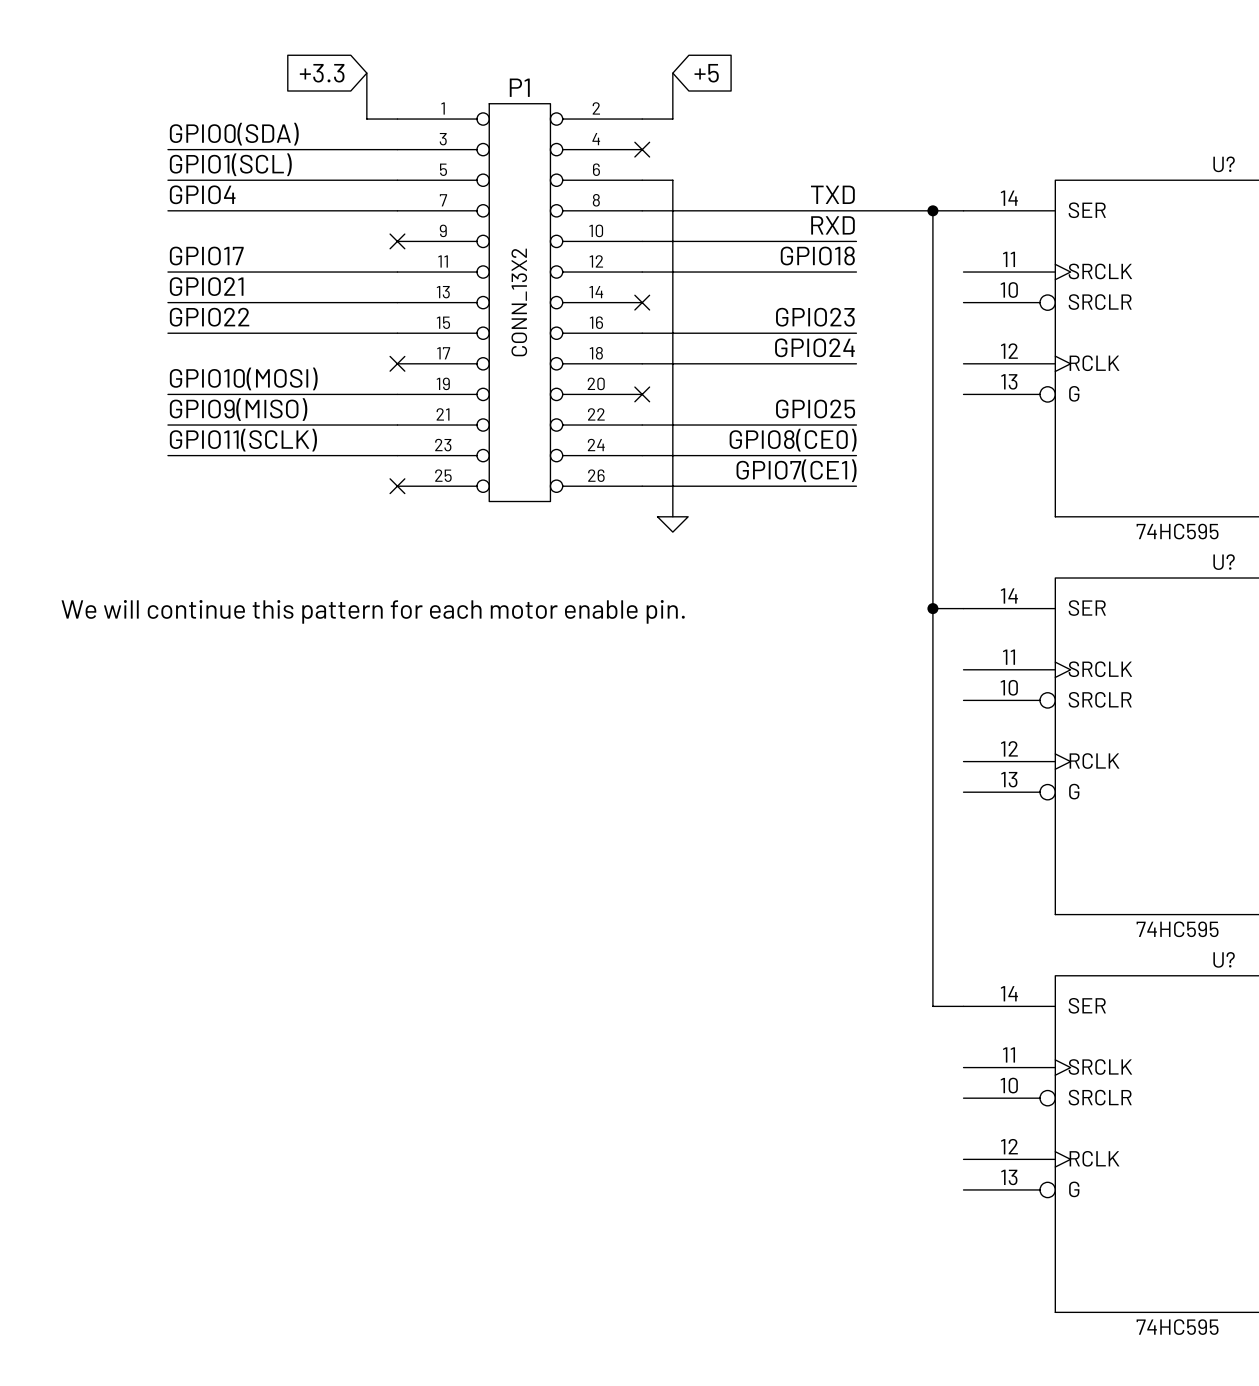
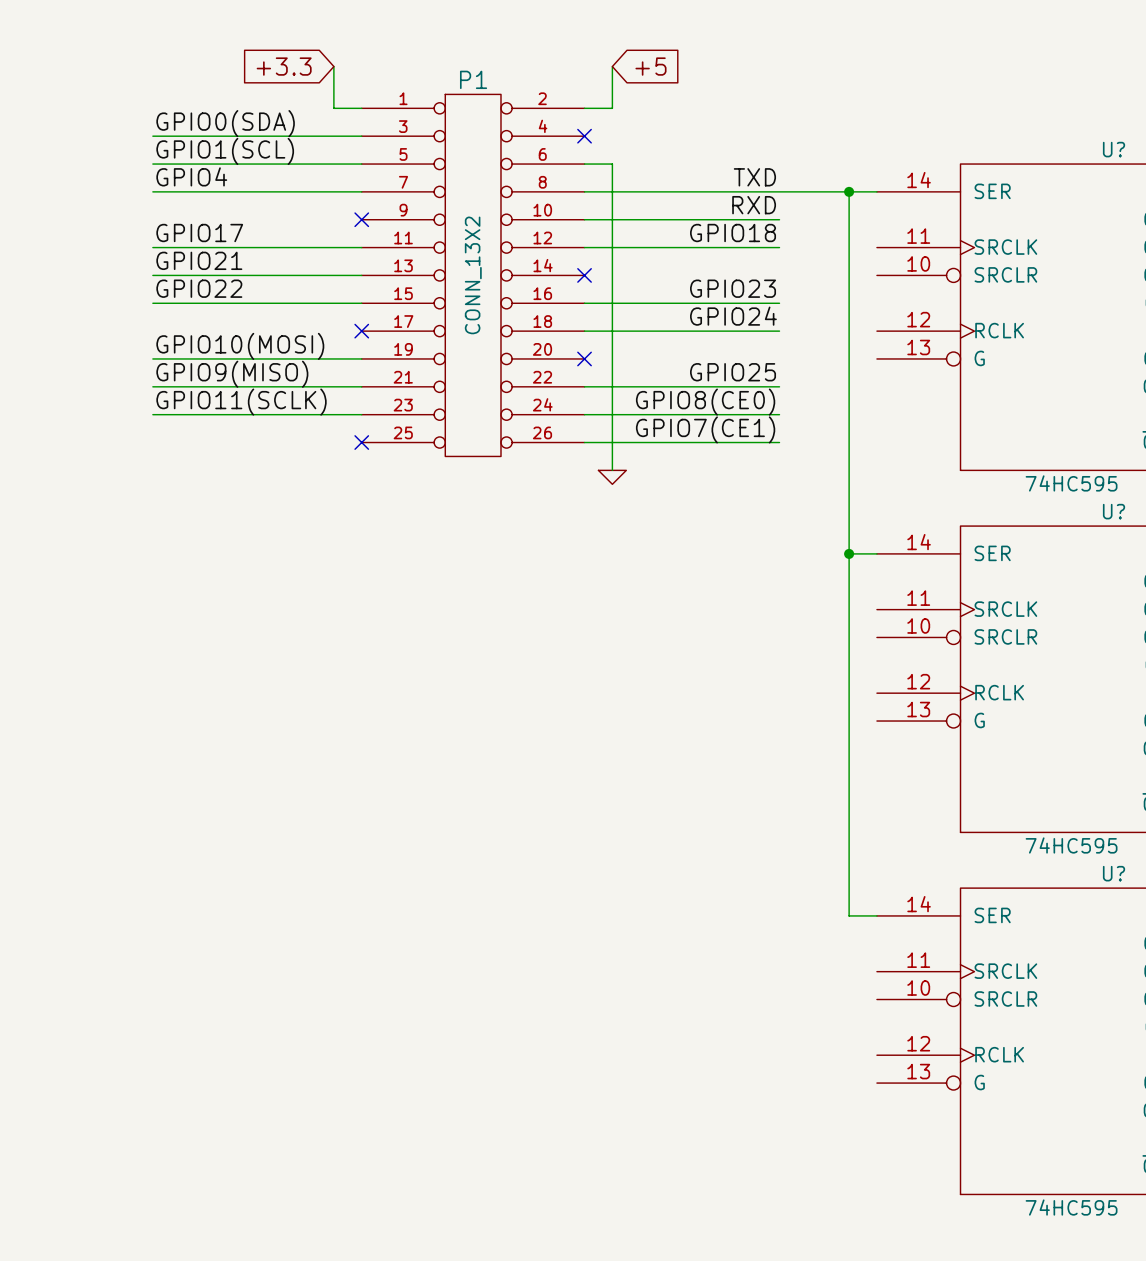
text: We will continue this pattern for each motor enable pin. (373, 611) -> none

